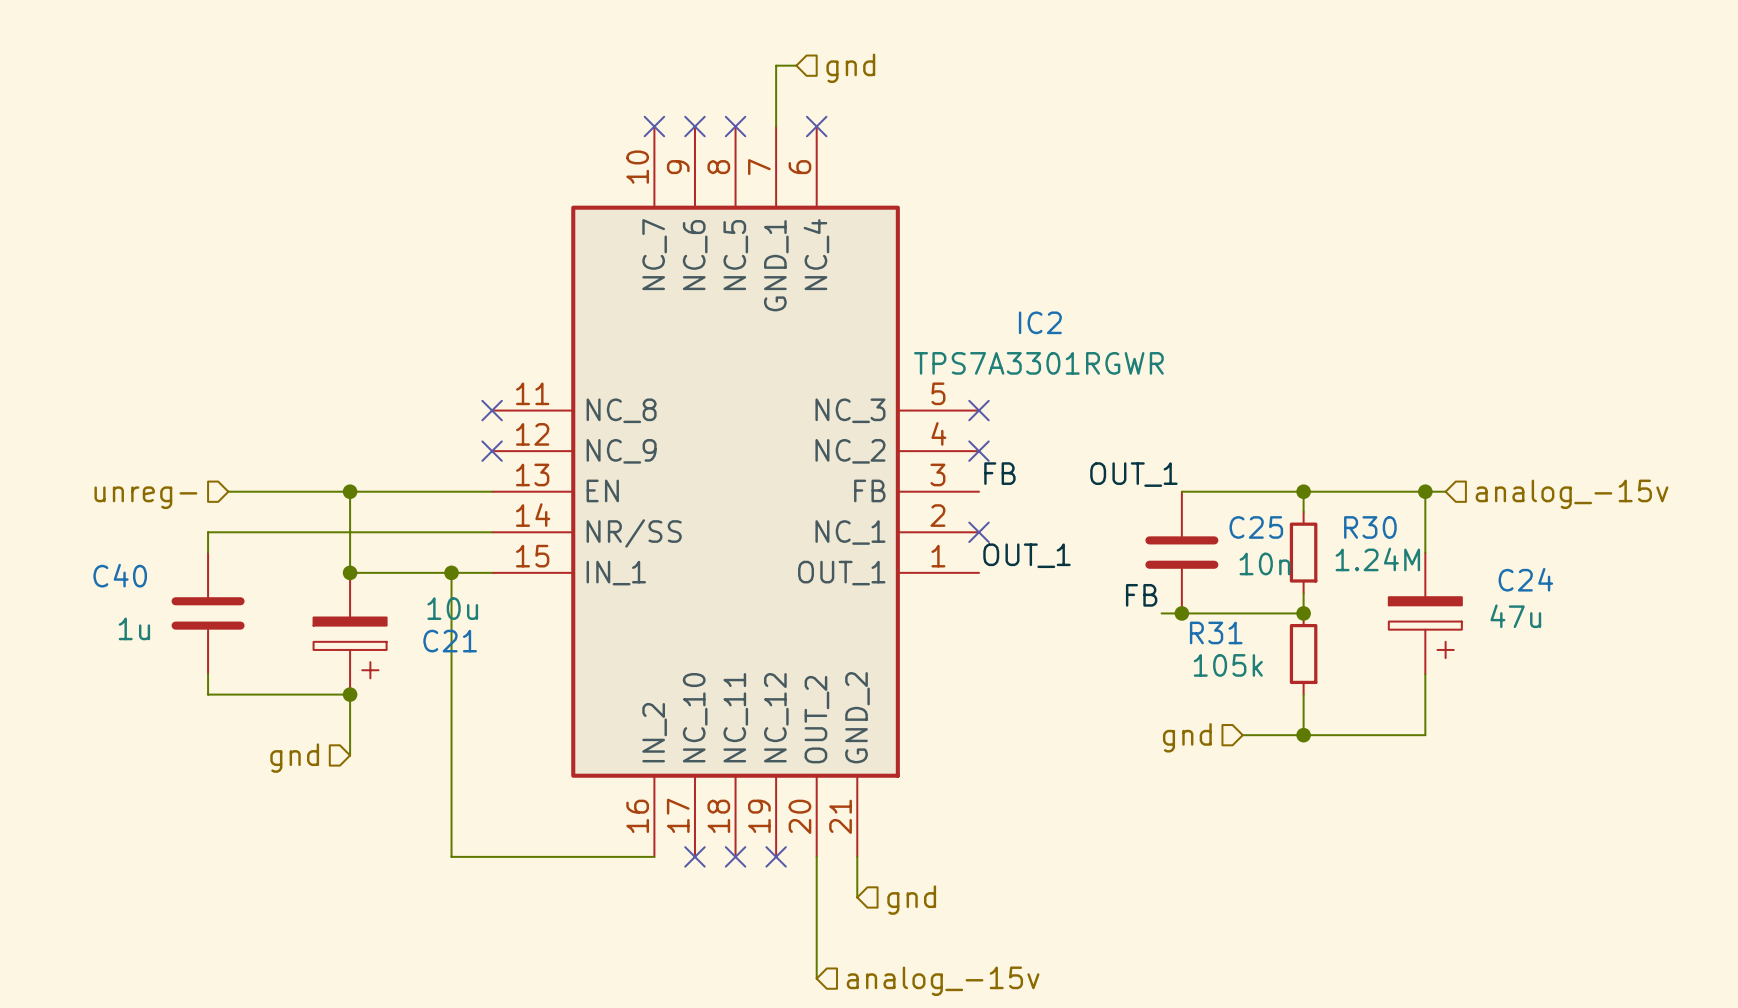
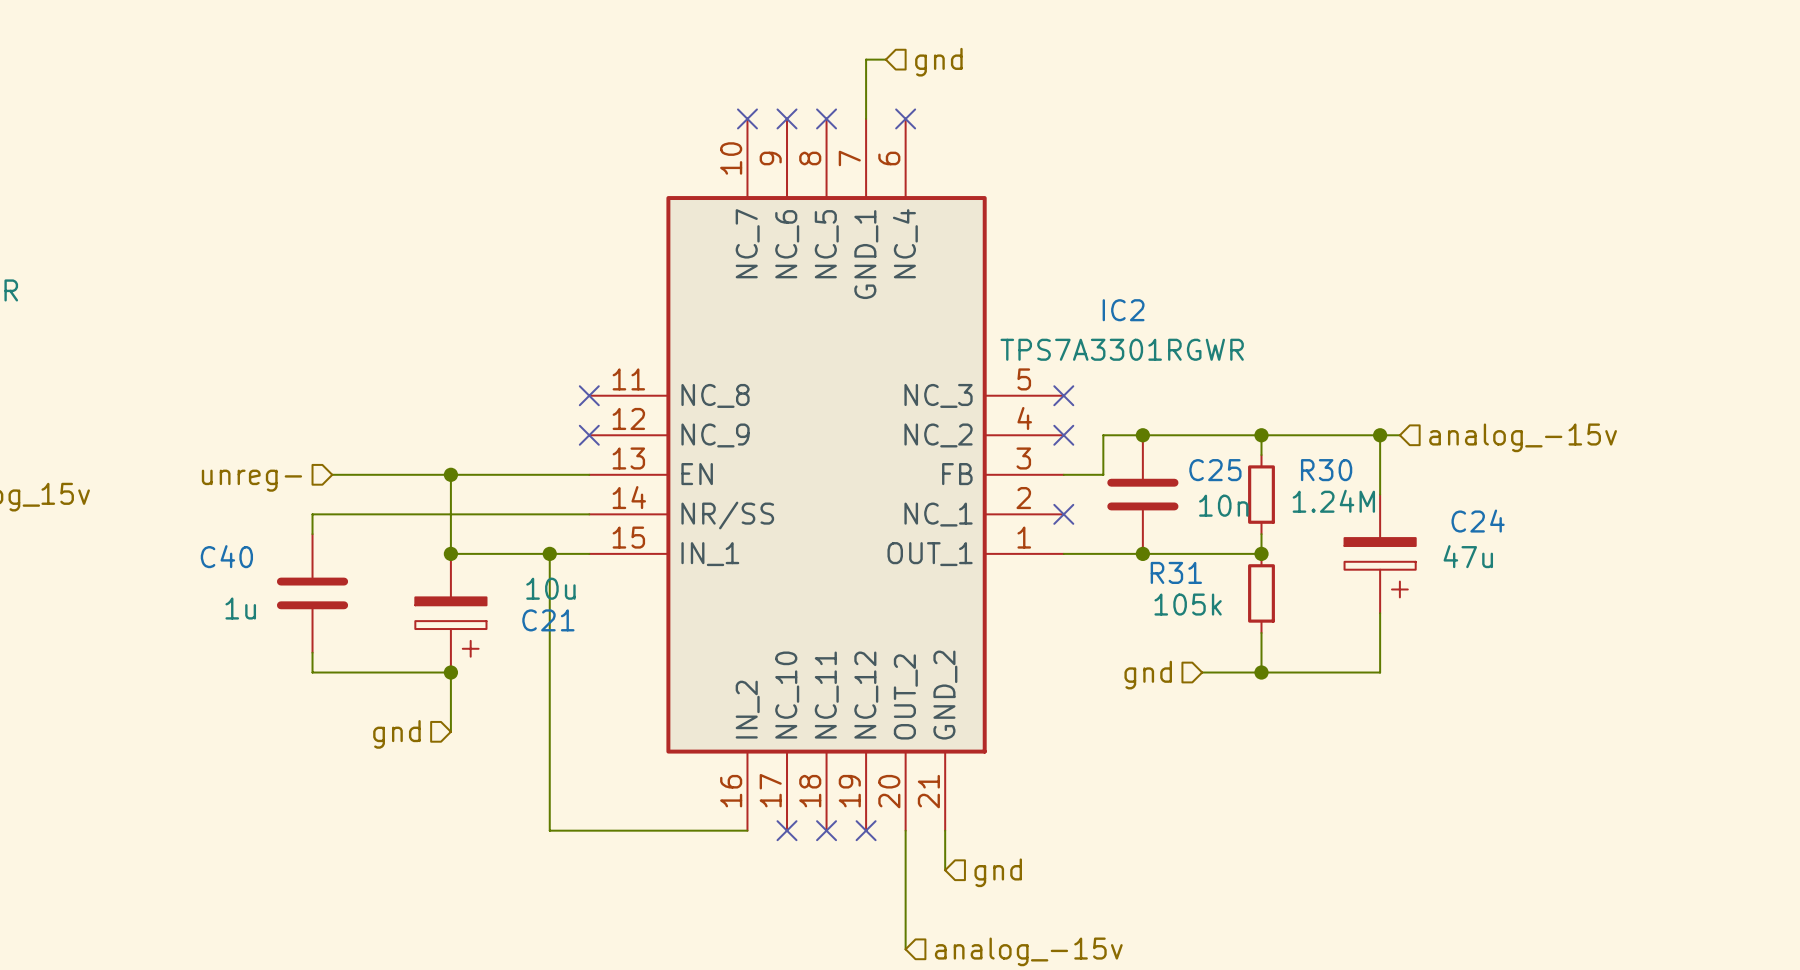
junction: none -> (1142, 435)
wire: none -> (1261, 435) (1261, 455)
junction: none -> (1261, 435)
wire: none -> (1380, 435) (1380, 474)
wire: none -> (1399, 435) (1103, 435) (1103, 474) (1063, 474)
label: FB (999, 473) -> none
label: OUT_1 (1133, 474) -> none
wire: (1181, 491) (1445, 491) -> none
junction position: (1303, 491) -> (1380, 435)
wire: (1425, 491) (1425, 552) -> none
junction: (1425, 491) -> none
hierarchical label position: analog_-15v (1572, 494) -> analog_-15v (1523, 437)
wire: none -> (1261, 534) (1261, 553) (1063, 553)
C25 position: (1181, 552) -> (1142, 494)
R30 position: (1303, 552) -> (1261, 494)
label: OUT_1 (1026, 555) -> none
junction: none -> (1142, 553)
junction: none -> (1261, 553)
wire: (1303, 593) (1303, 613) (1161, 613) -> none
label: FB (1141, 595) -> none
junction: (1181, 613) -> none
junction: (1303, 613) -> none
C24 position: (1425, 613) -> (1380, 553)
R31 position: (1303, 654) -> (1261, 593)
wire: (1425, 674) (1425, 735) (1242, 735) -> (1380, 613) (1380, 672) (1202, 672)
junction: none -> (1261, 672)
wire: (1303, 694) (1303, 735) -> (1261, 632) (1261, 672)
junction: (1303, 735) -> none
hierarchical label position: gnd (1187, 737) -> gnd (1148, 675)

